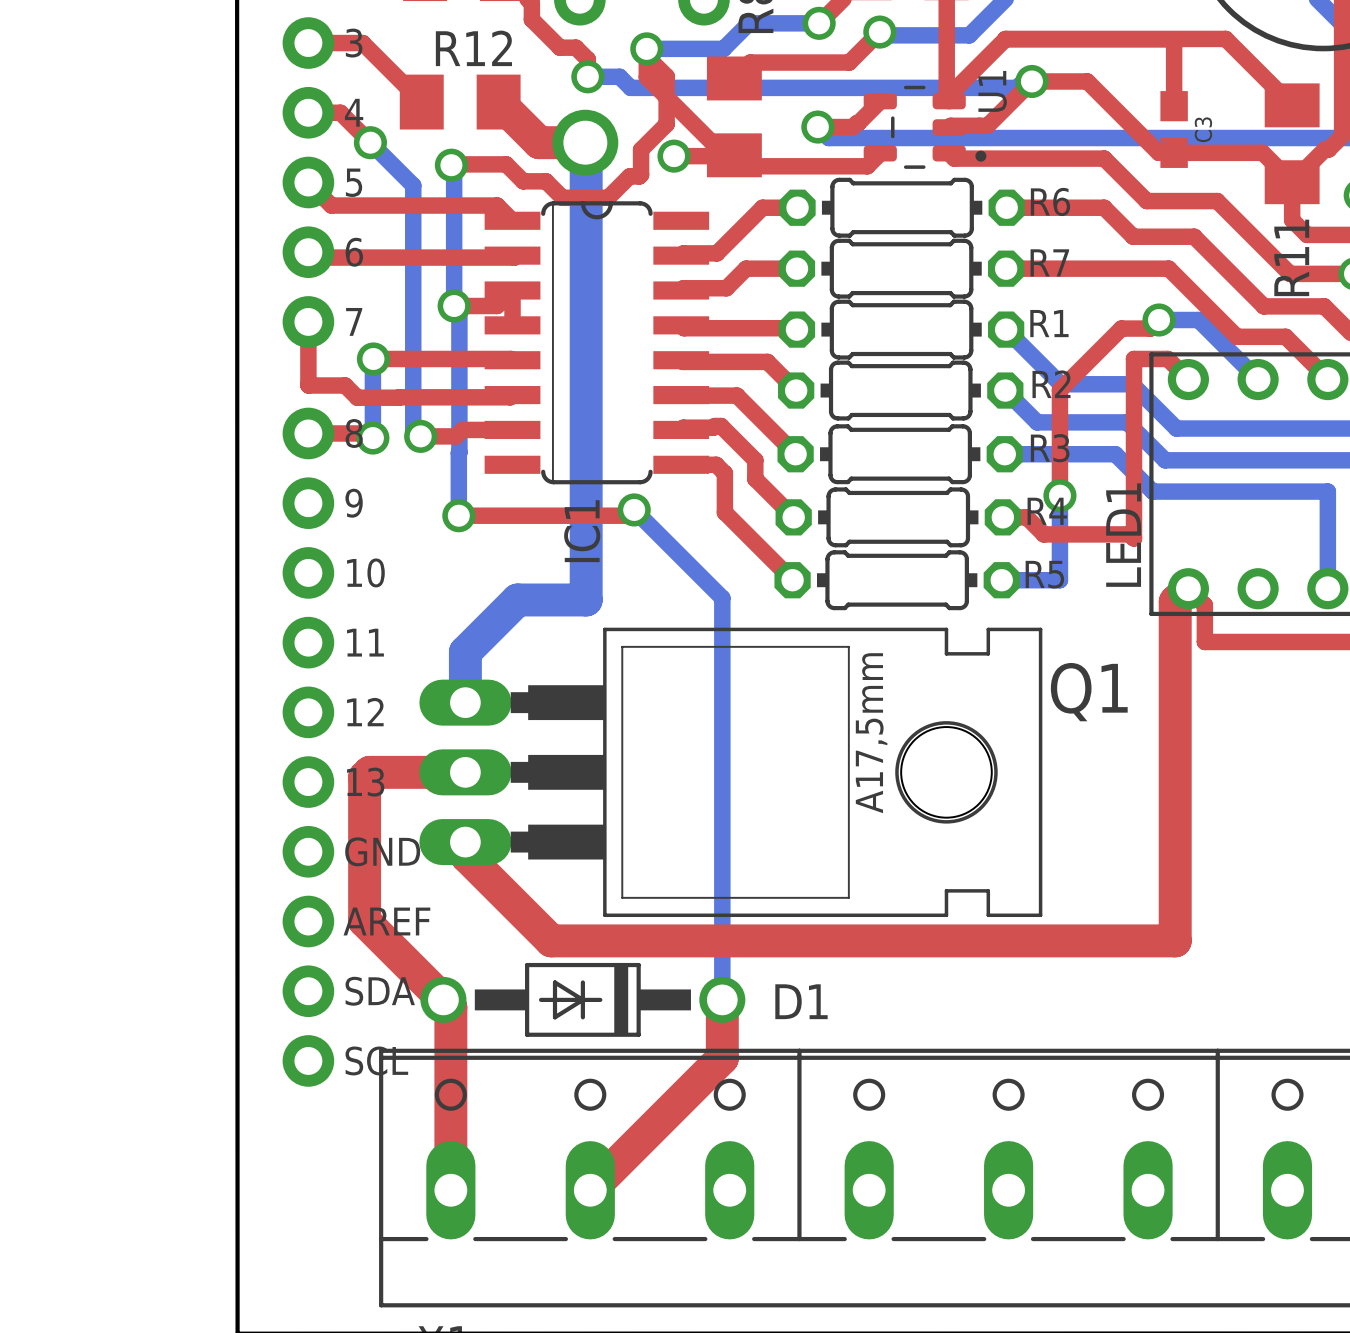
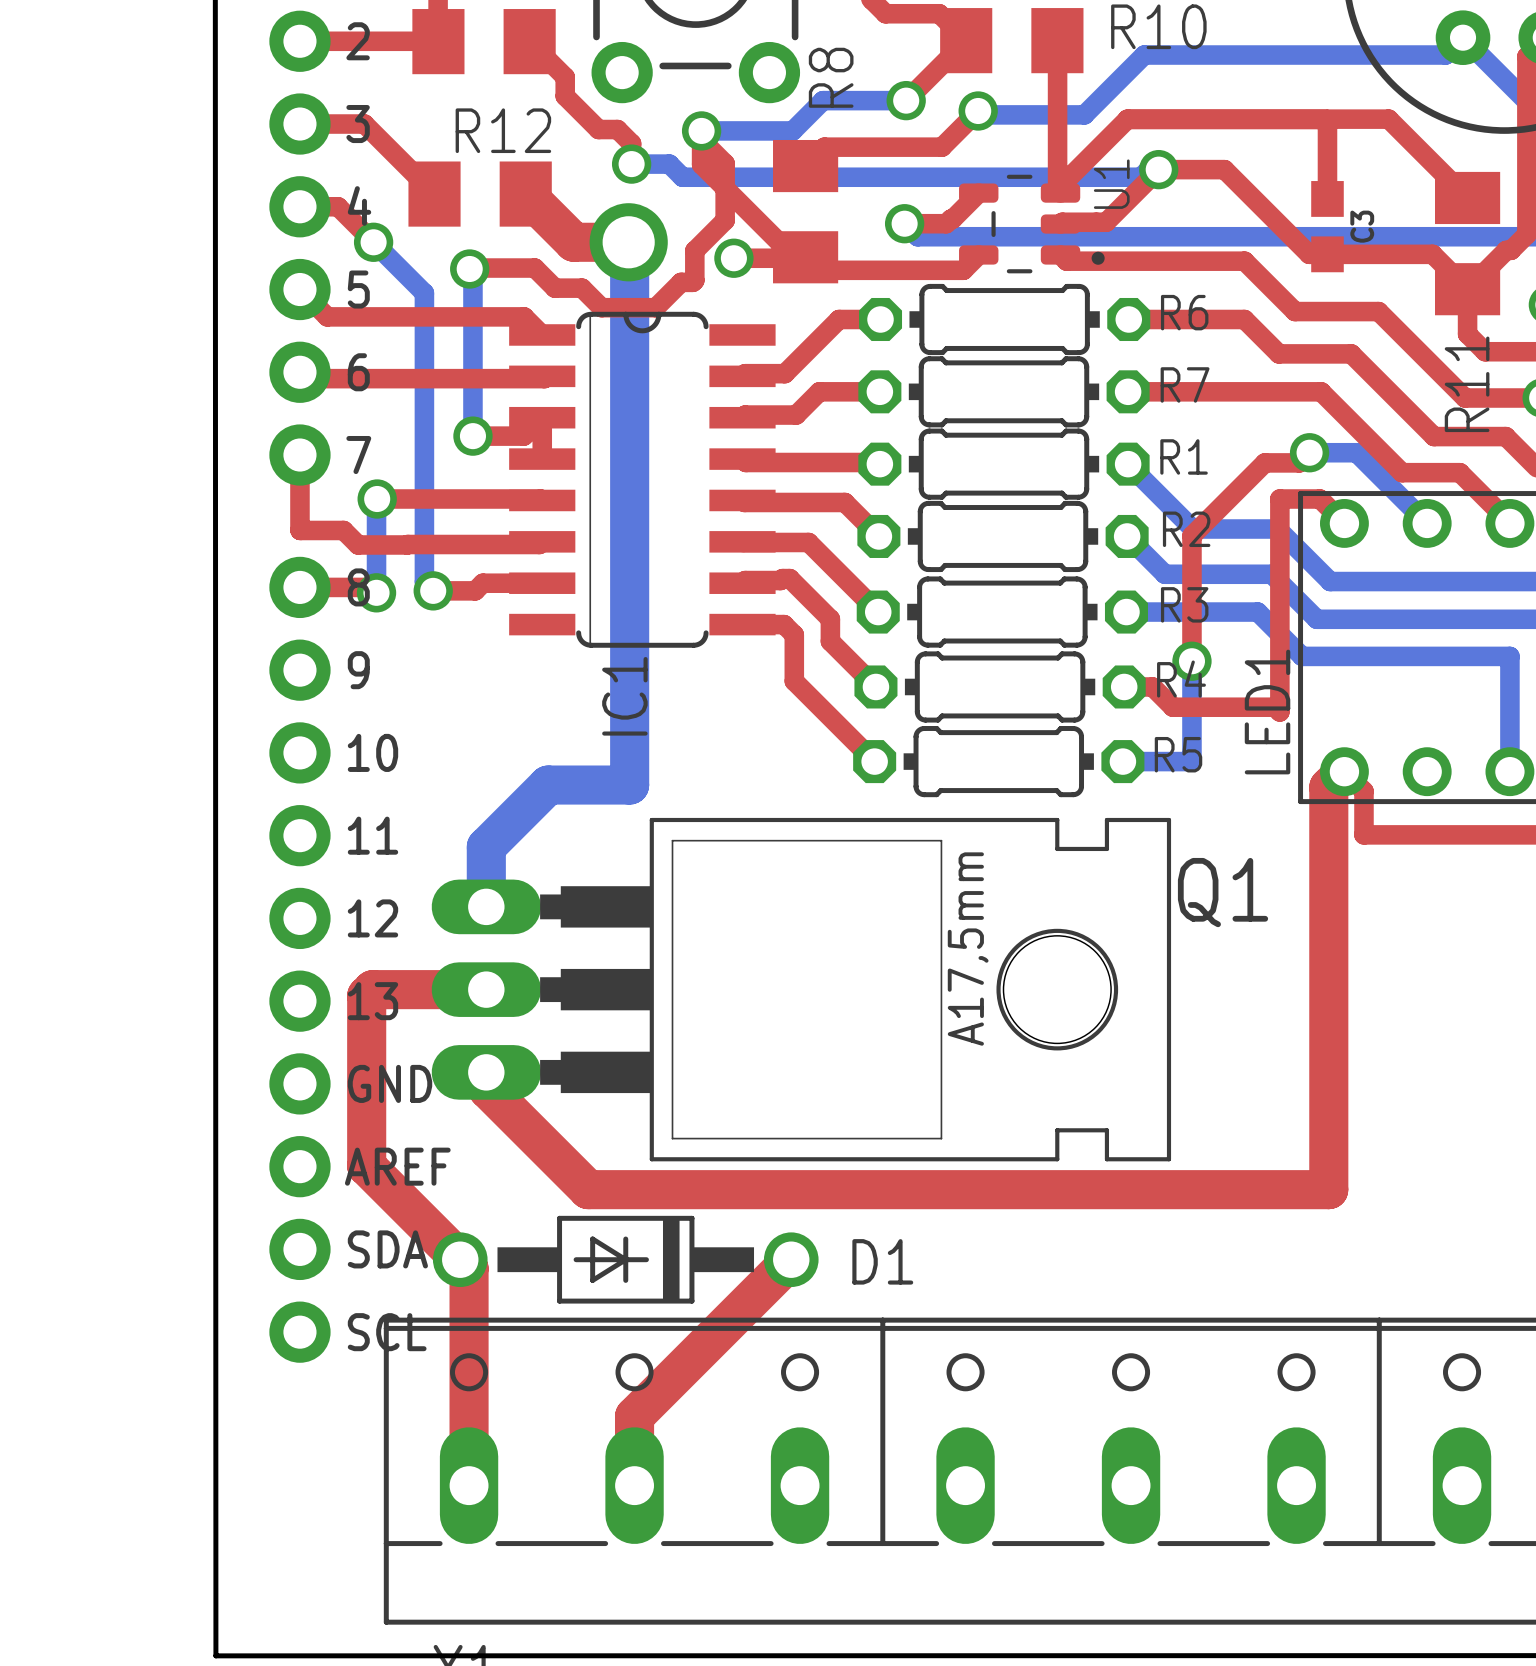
bottom track: (454, 306) (459, 311) (458, 515) -> none
top track: (634, 509) (628, 515) (458, 515) -> none
bottom track: (634, 509) (722, 598) (722, 999) -> none
via: (634, 509) -> none
via: (458, 515) -> none
top track: (722, 999) (722, 1058) (590, 1190) -> (791, 1259) (634, 1416) (634, 1485)

